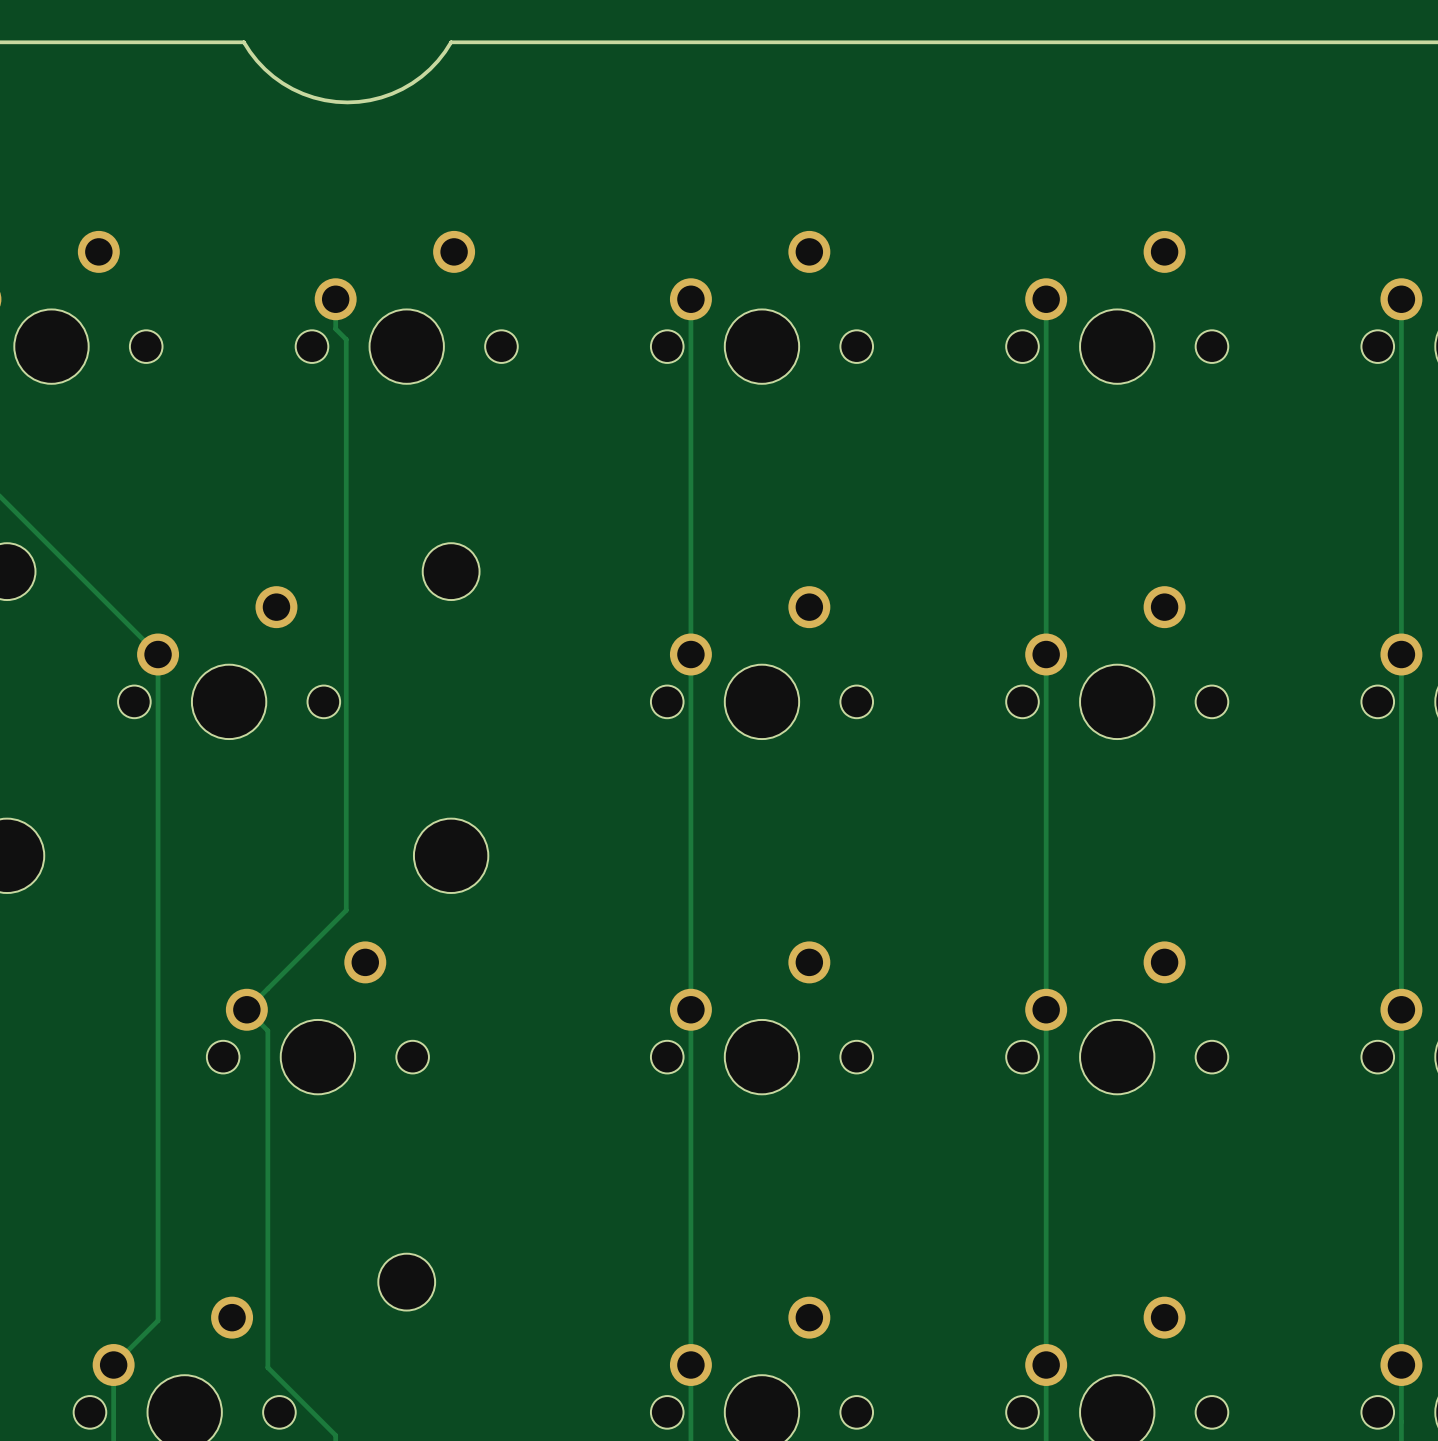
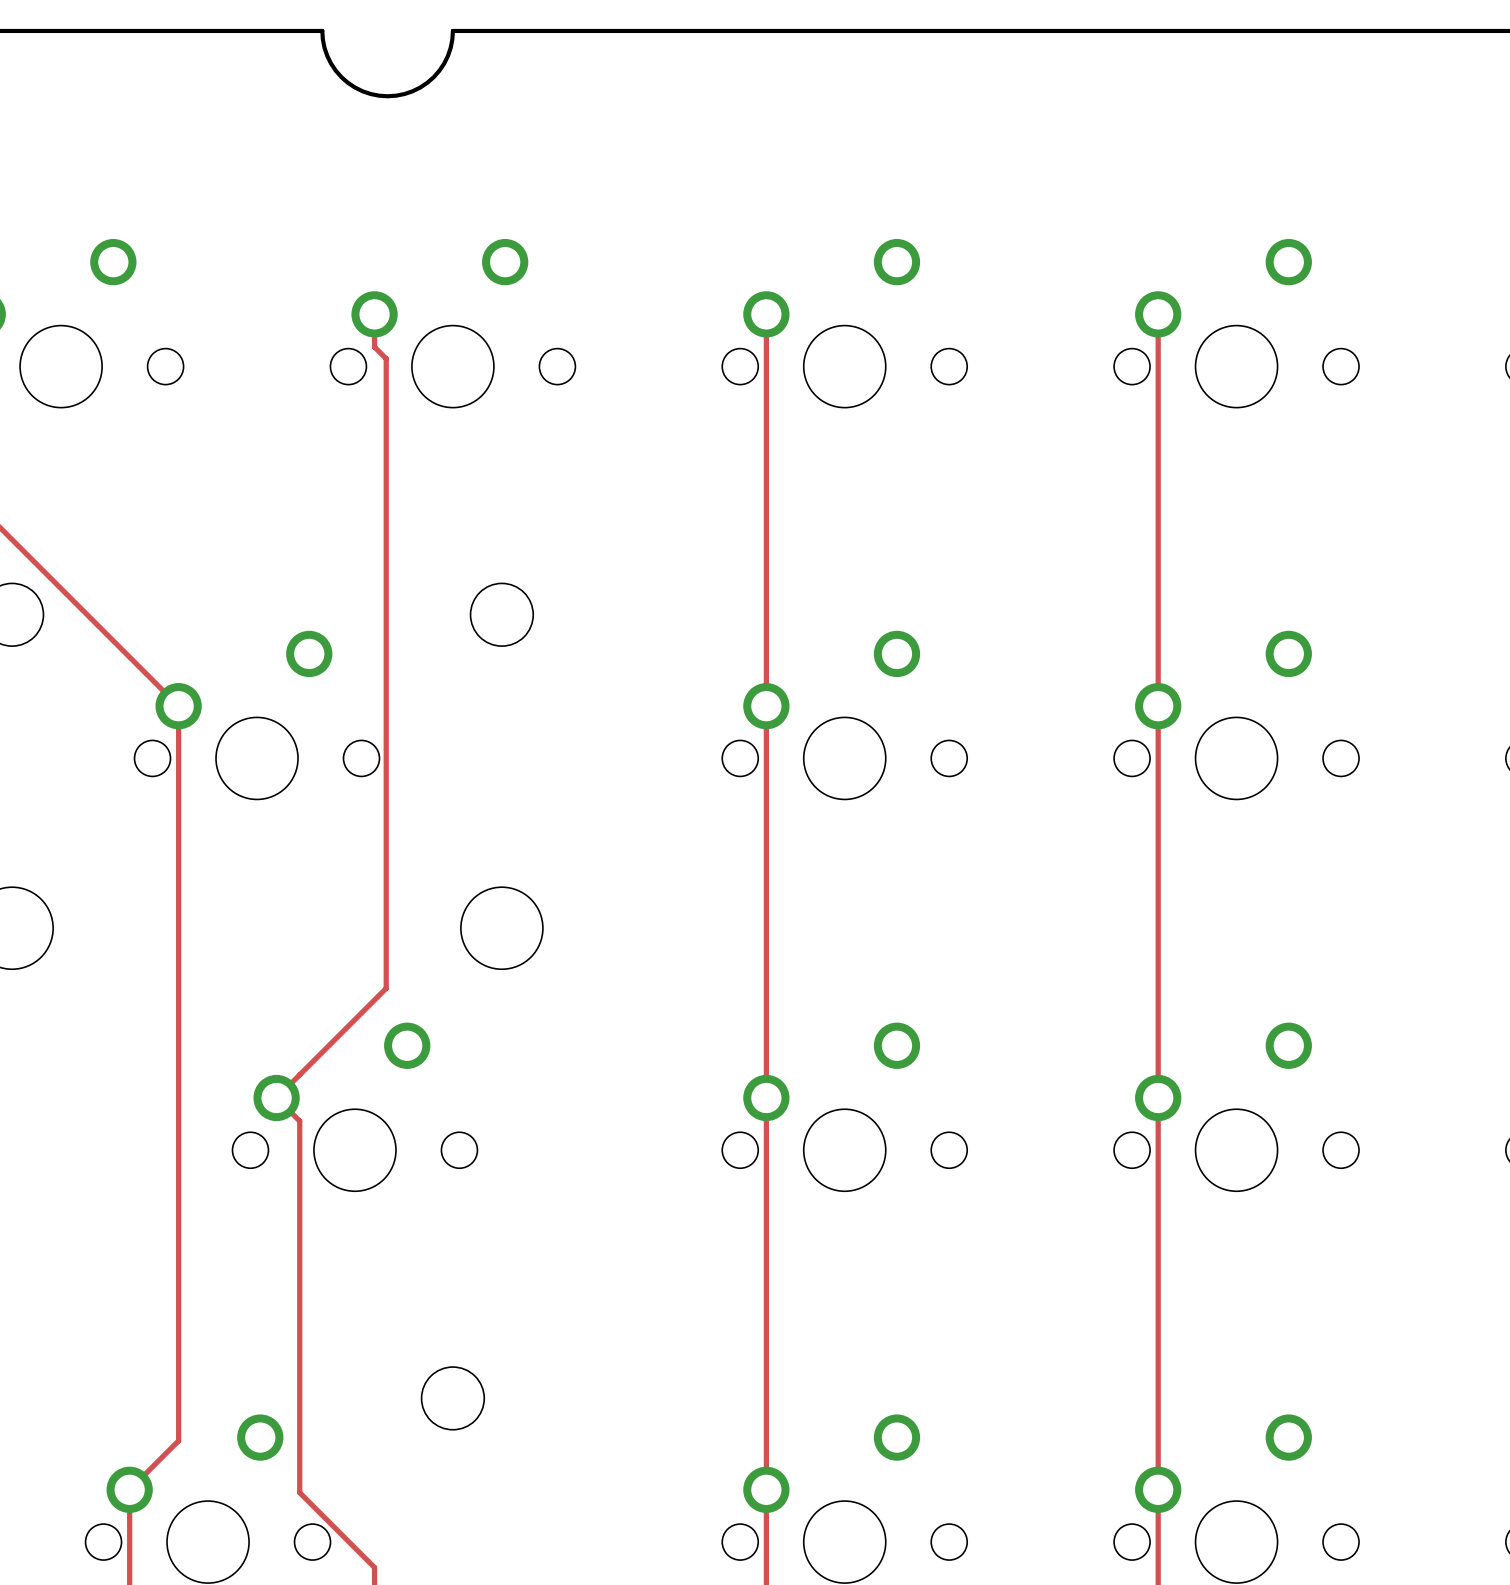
board edge: (243, 42) (264, 69) (282, 83) (313, 97) (347, 102) (370, 100) (402, 89) (430, 69) (451, 42) -> (273, 30) (322, 30) (327, 55) (341, 77) (362, 91) (387, 96) (412, 91) (433, 77) (447, 55) (452, 30)
board edge: none -> (452, 30) (501, 30)

